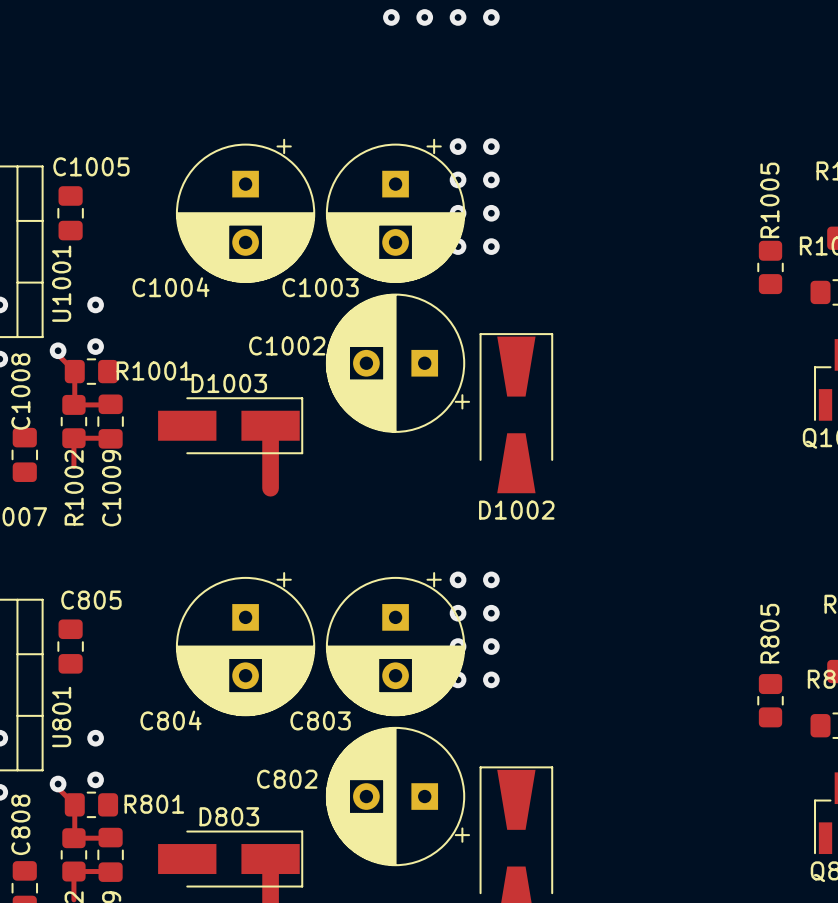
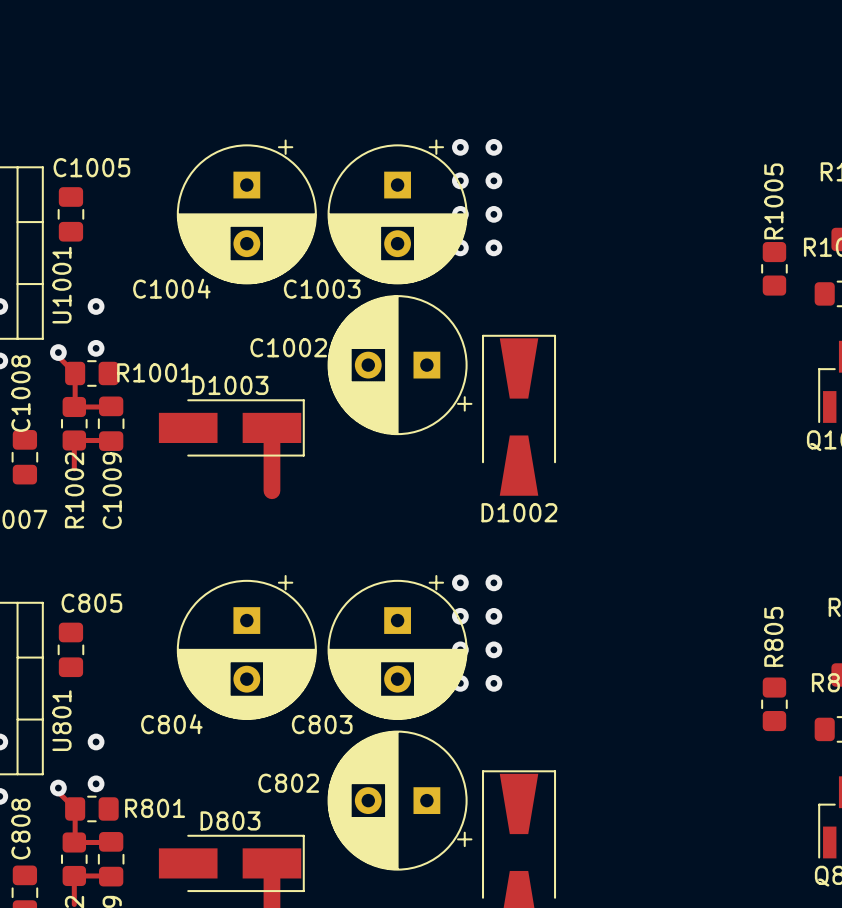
via: (391, 17) -> none
via: (424, 17) -> none
via: (458, 17) -> none
via: (491, 17) -> none

